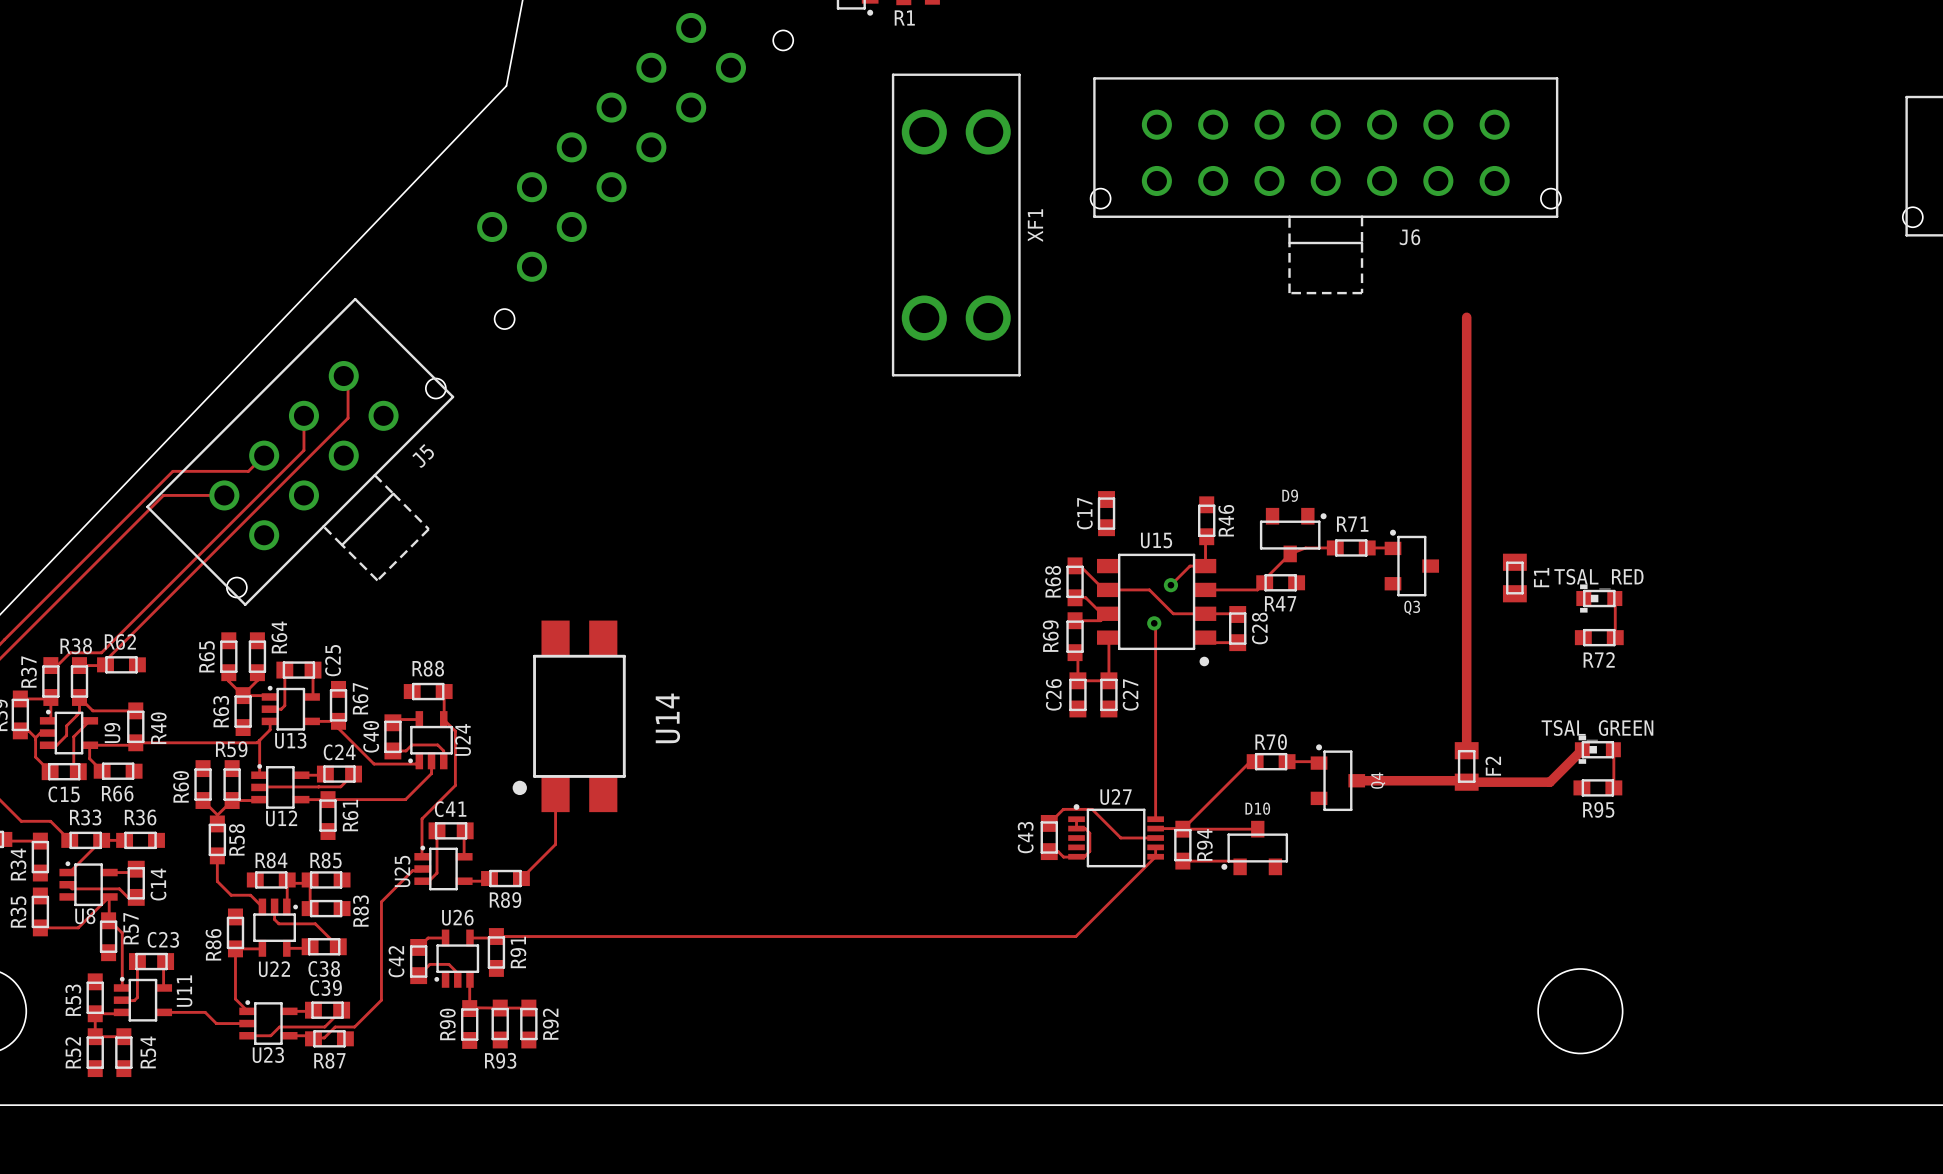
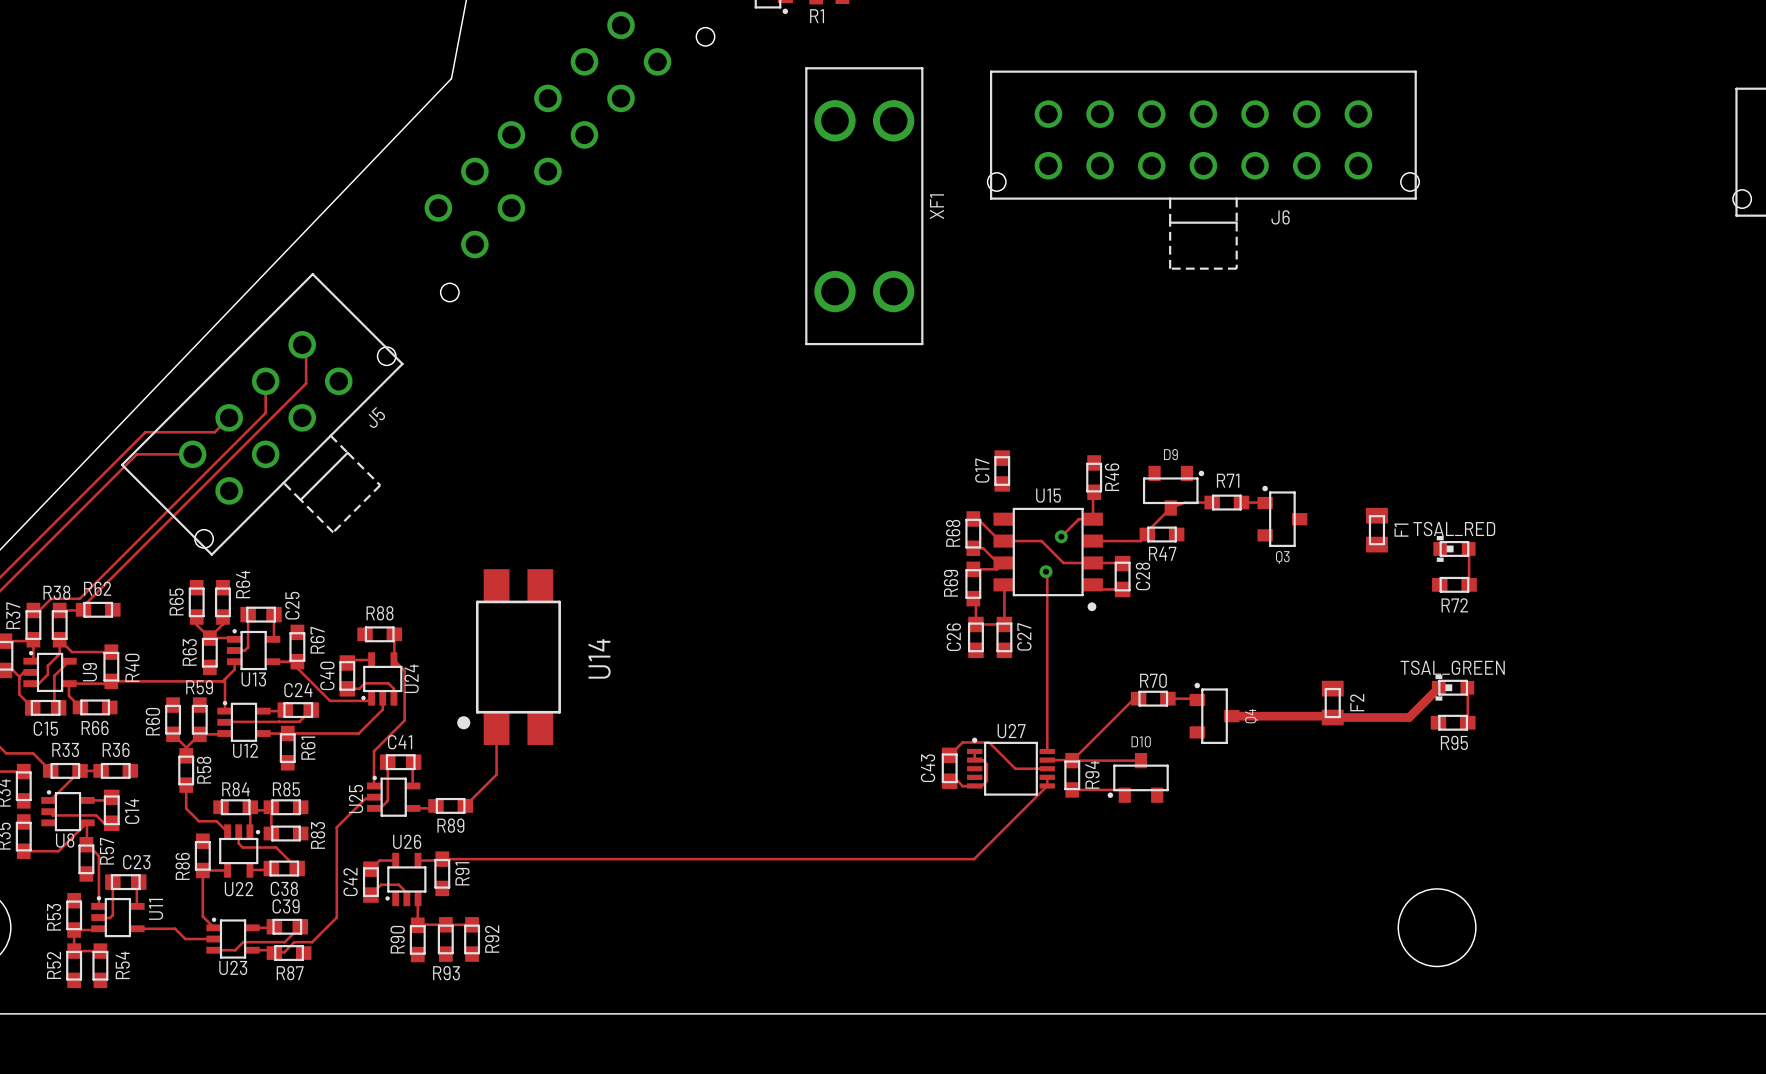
track: (1466, 317) (1466, 750) -> none

